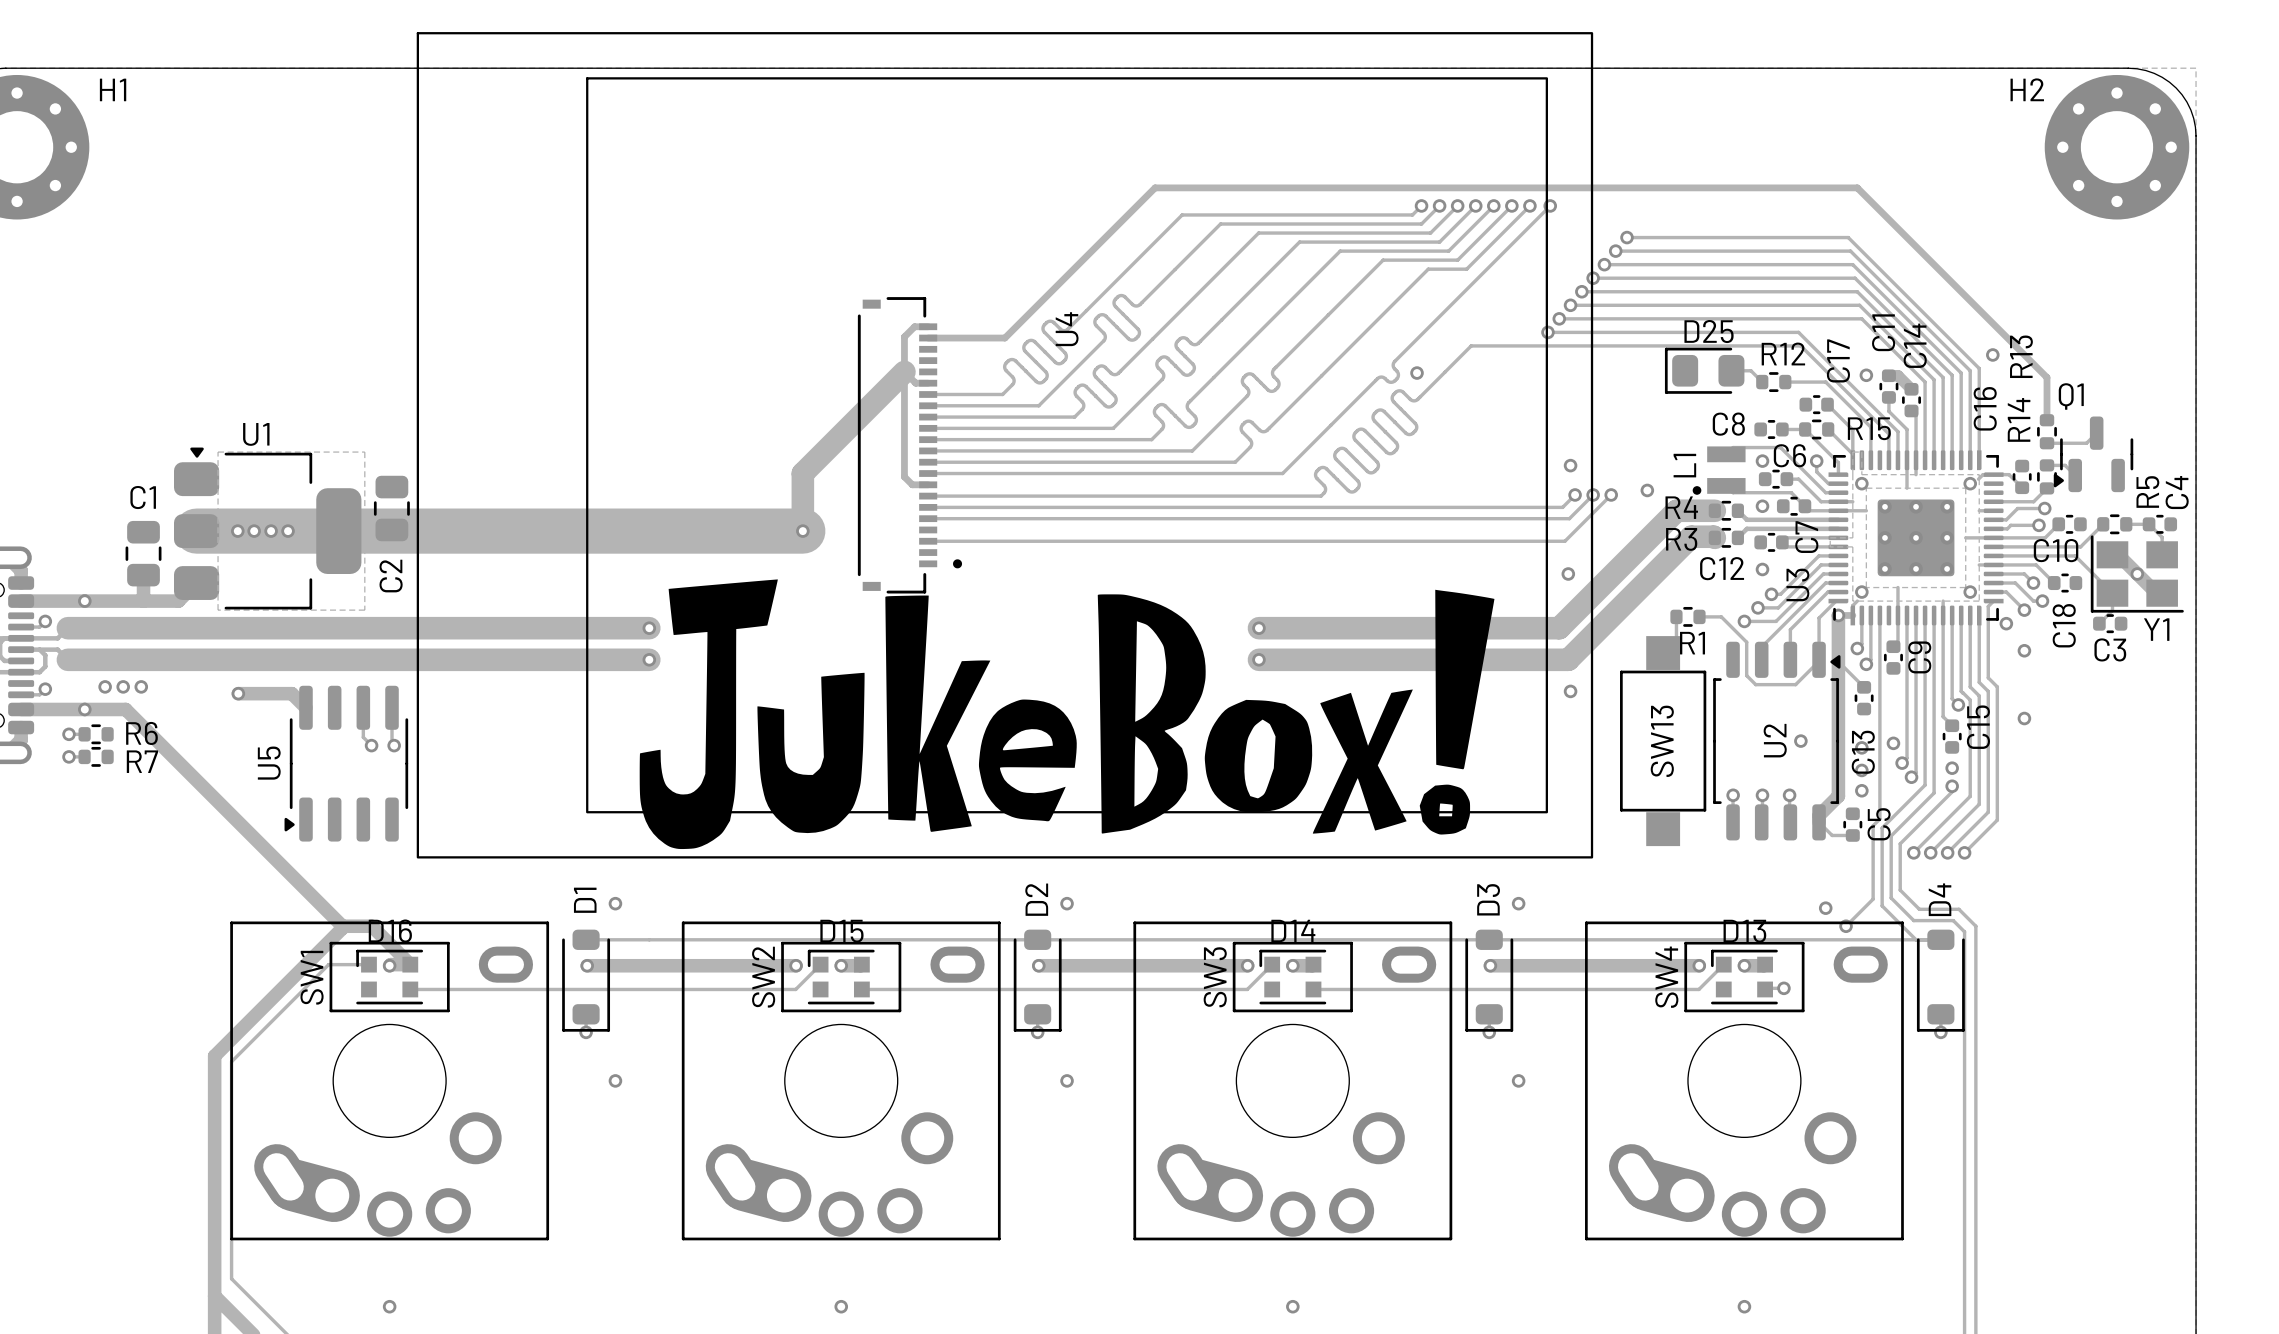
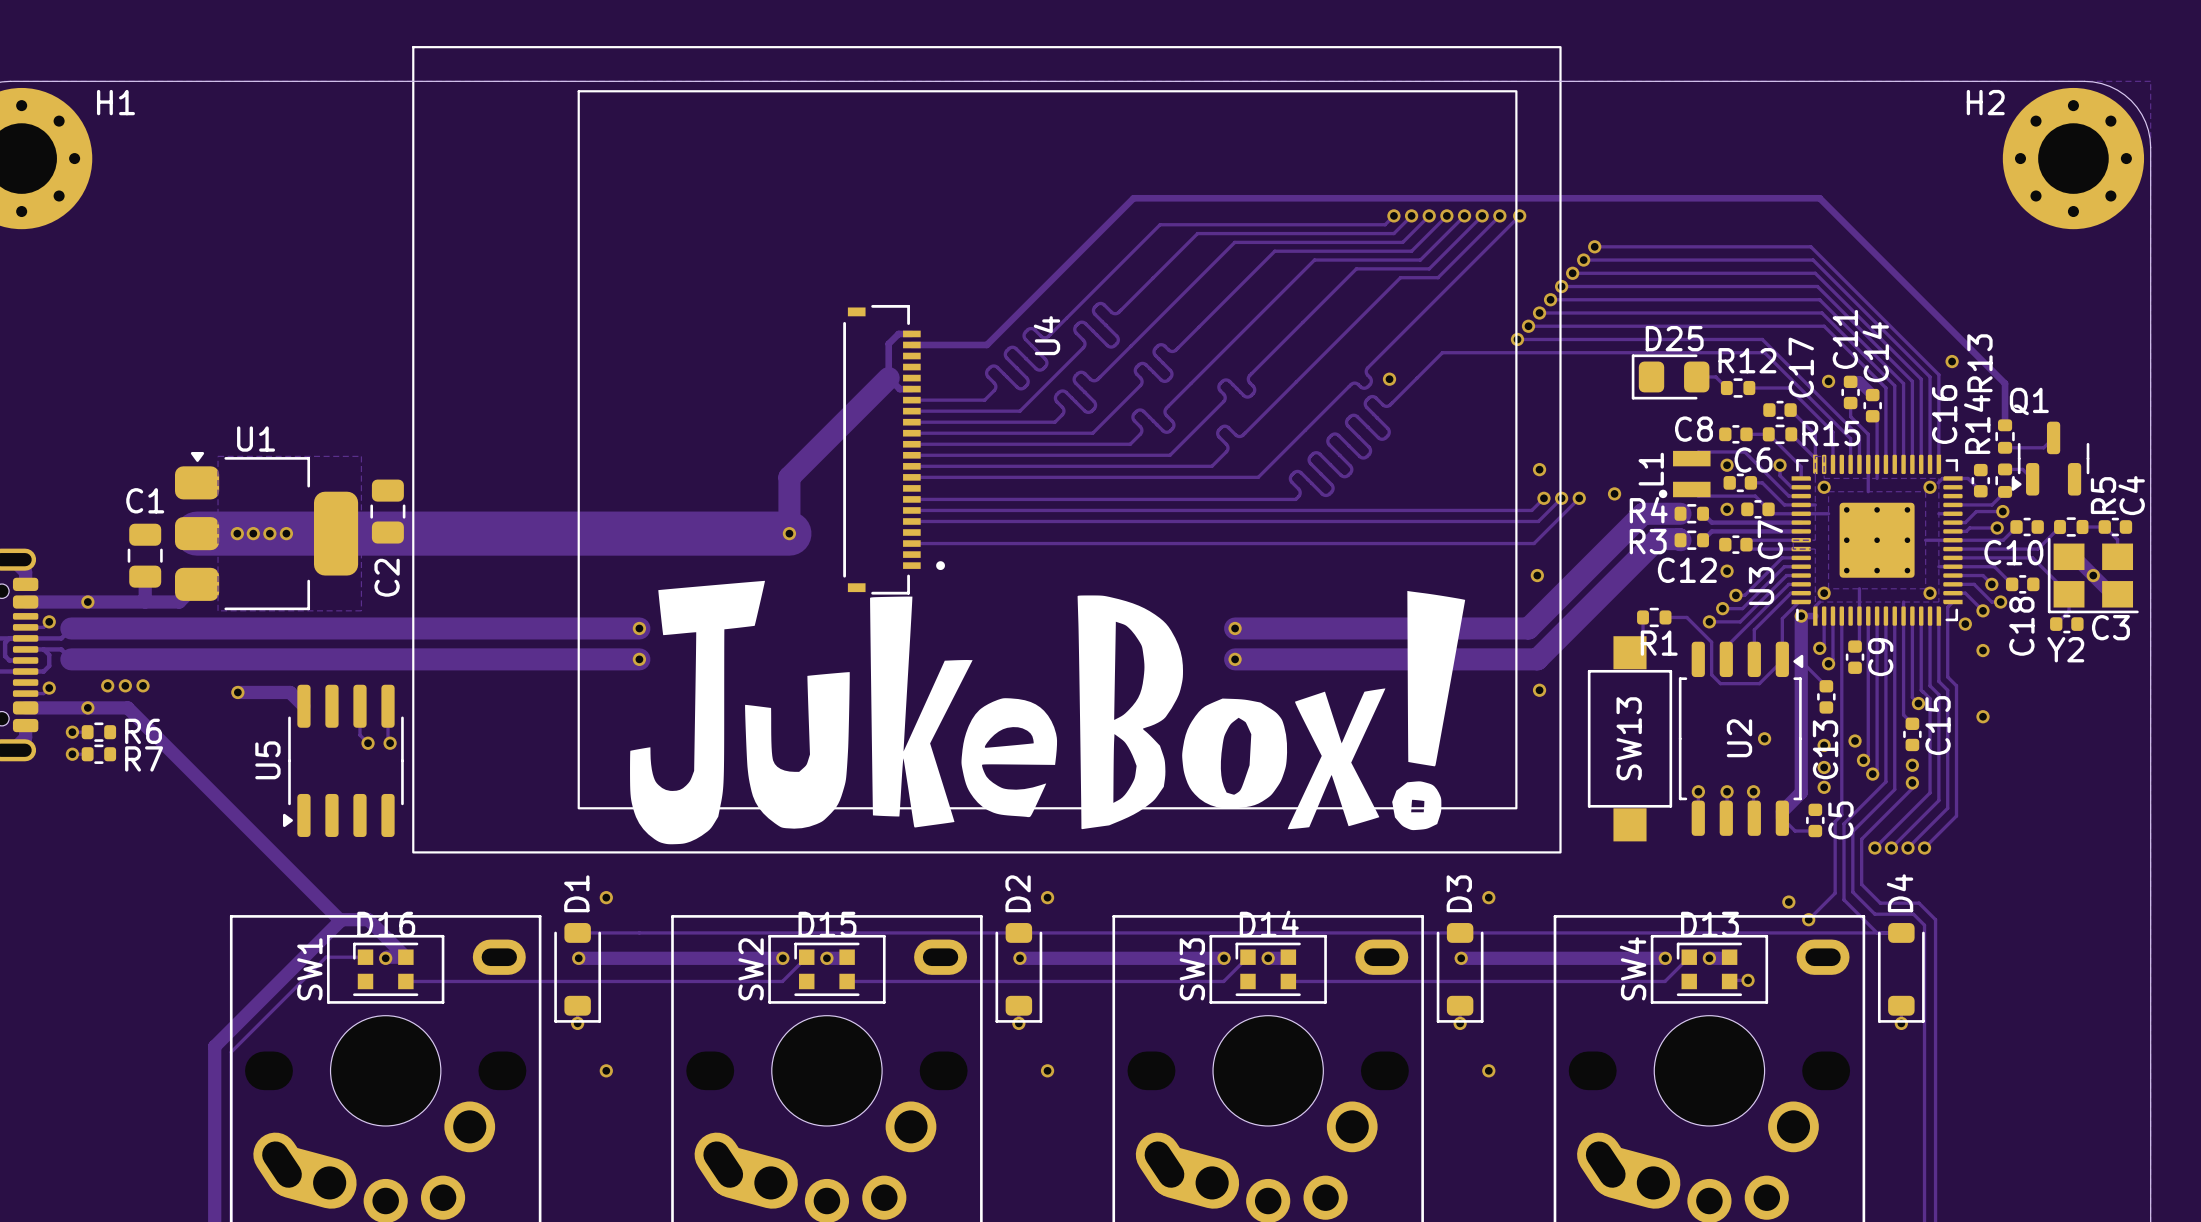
track: (904, 371) (904, 476) (912, 484) (928, 484) -> none
Y1 name: Y1 (2156, 629) -> Y2 (2065, 649)
C3 name position: C3 (2110, 649) -> C3 (2110, 627)

